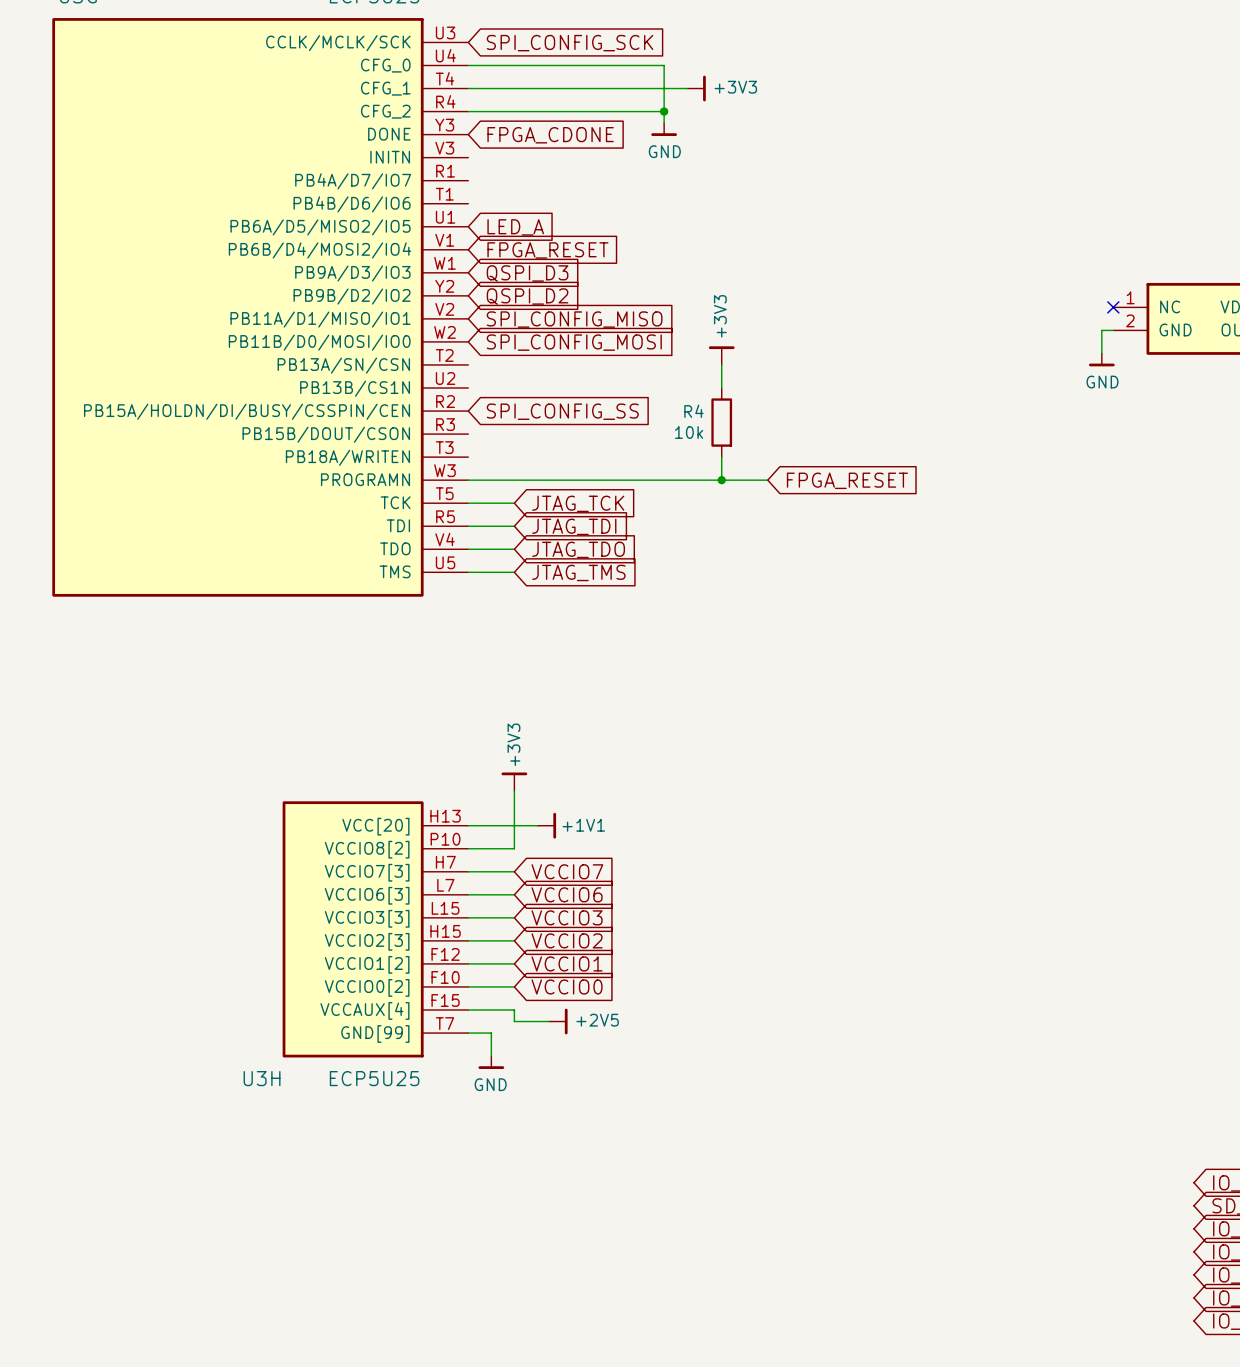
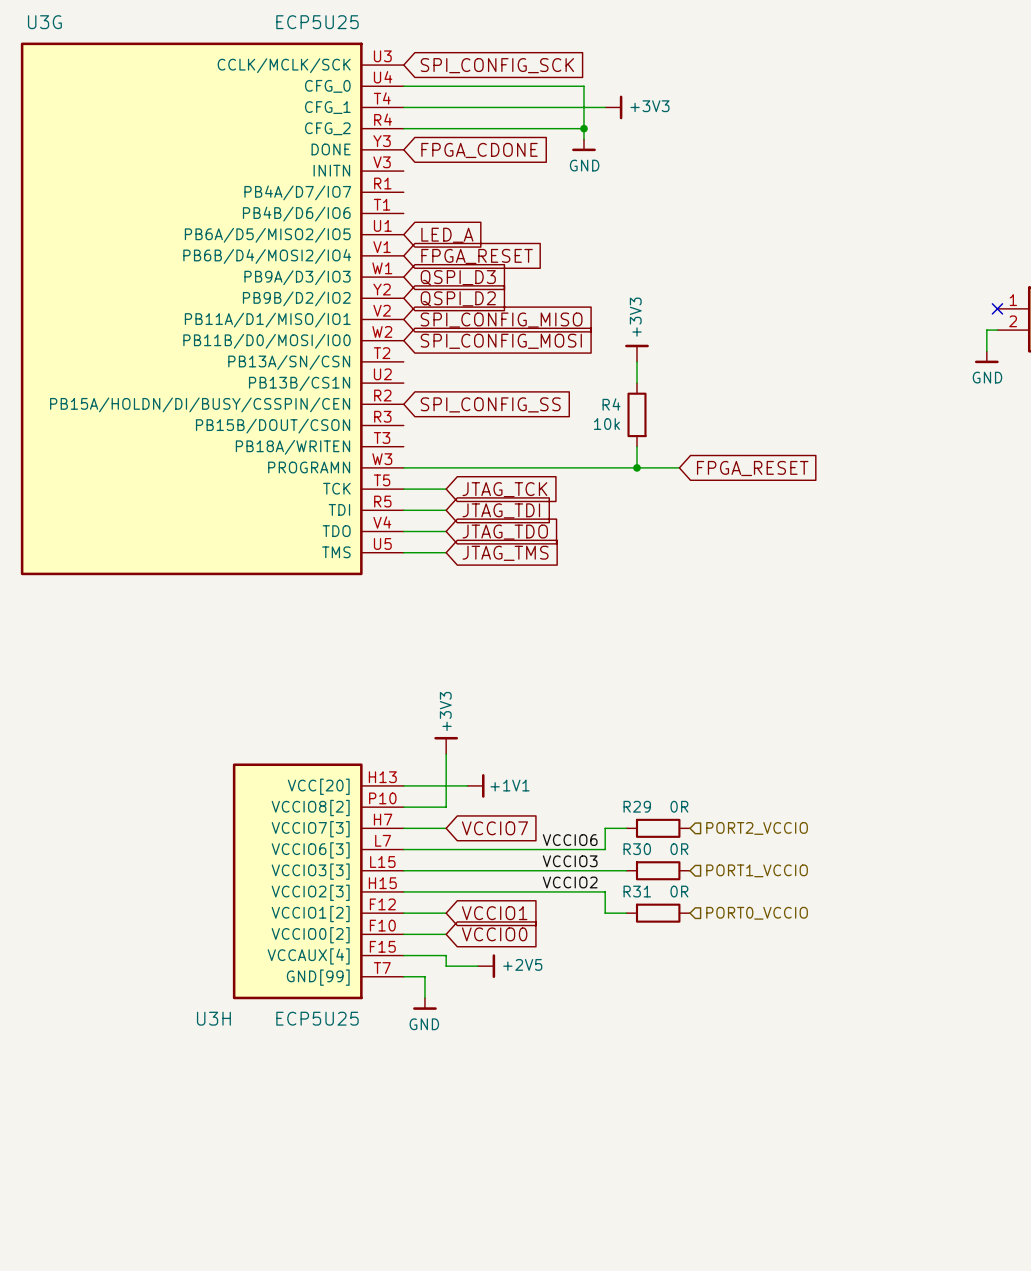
wire: none -> (626, 828) (605, 828) (605, 849) (446, 849)
R29: none -> 0R (658, 828)
hierarchical label: none -> PORT2_VCCIO (757, 828)
label: none -> VCCIO6 (570, 840)
global label: VCCIO6 (567, 894) -> none
label: none -> VCCIO3 (570, 861)
wire: none -> (446, 870) (626, 870)
global label: VCCIO3 (567, 917) -> none
R30: none -> 0R (658, 870)
hierarchical label: none -> PORT1_VCCIO (757, 870)
label: none -> VCCIO2 (570, 882)
wire: none -> (446, 891) (605, 891) (605, 913) (626, 913)
global label: VCCIO2 (567, 940) -> none
R31: none -> 0R (658, 913)
hierarchical label: none -> PORT0_VCCIO (757, 913)

